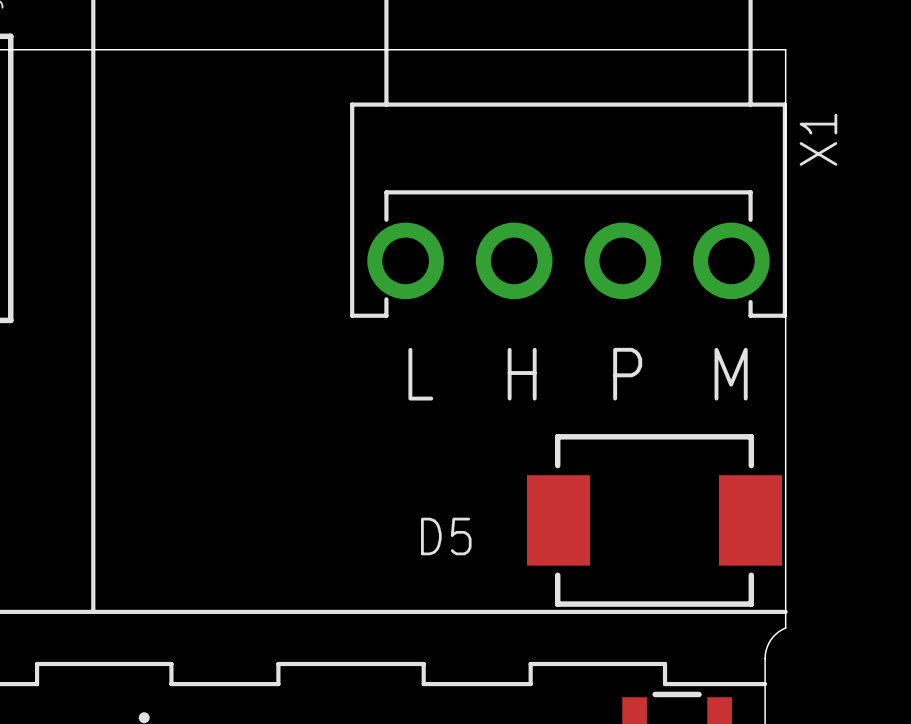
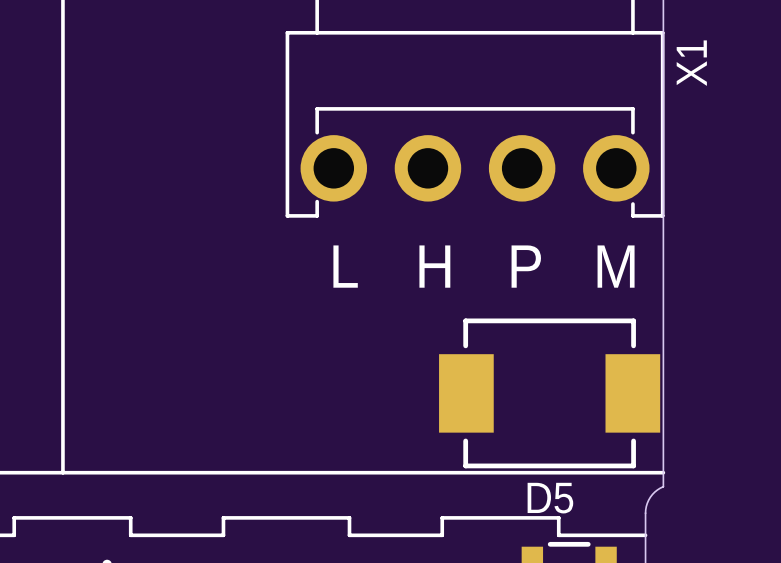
D5 name position: D5 (446, 536) -> D5 (550, 498)

